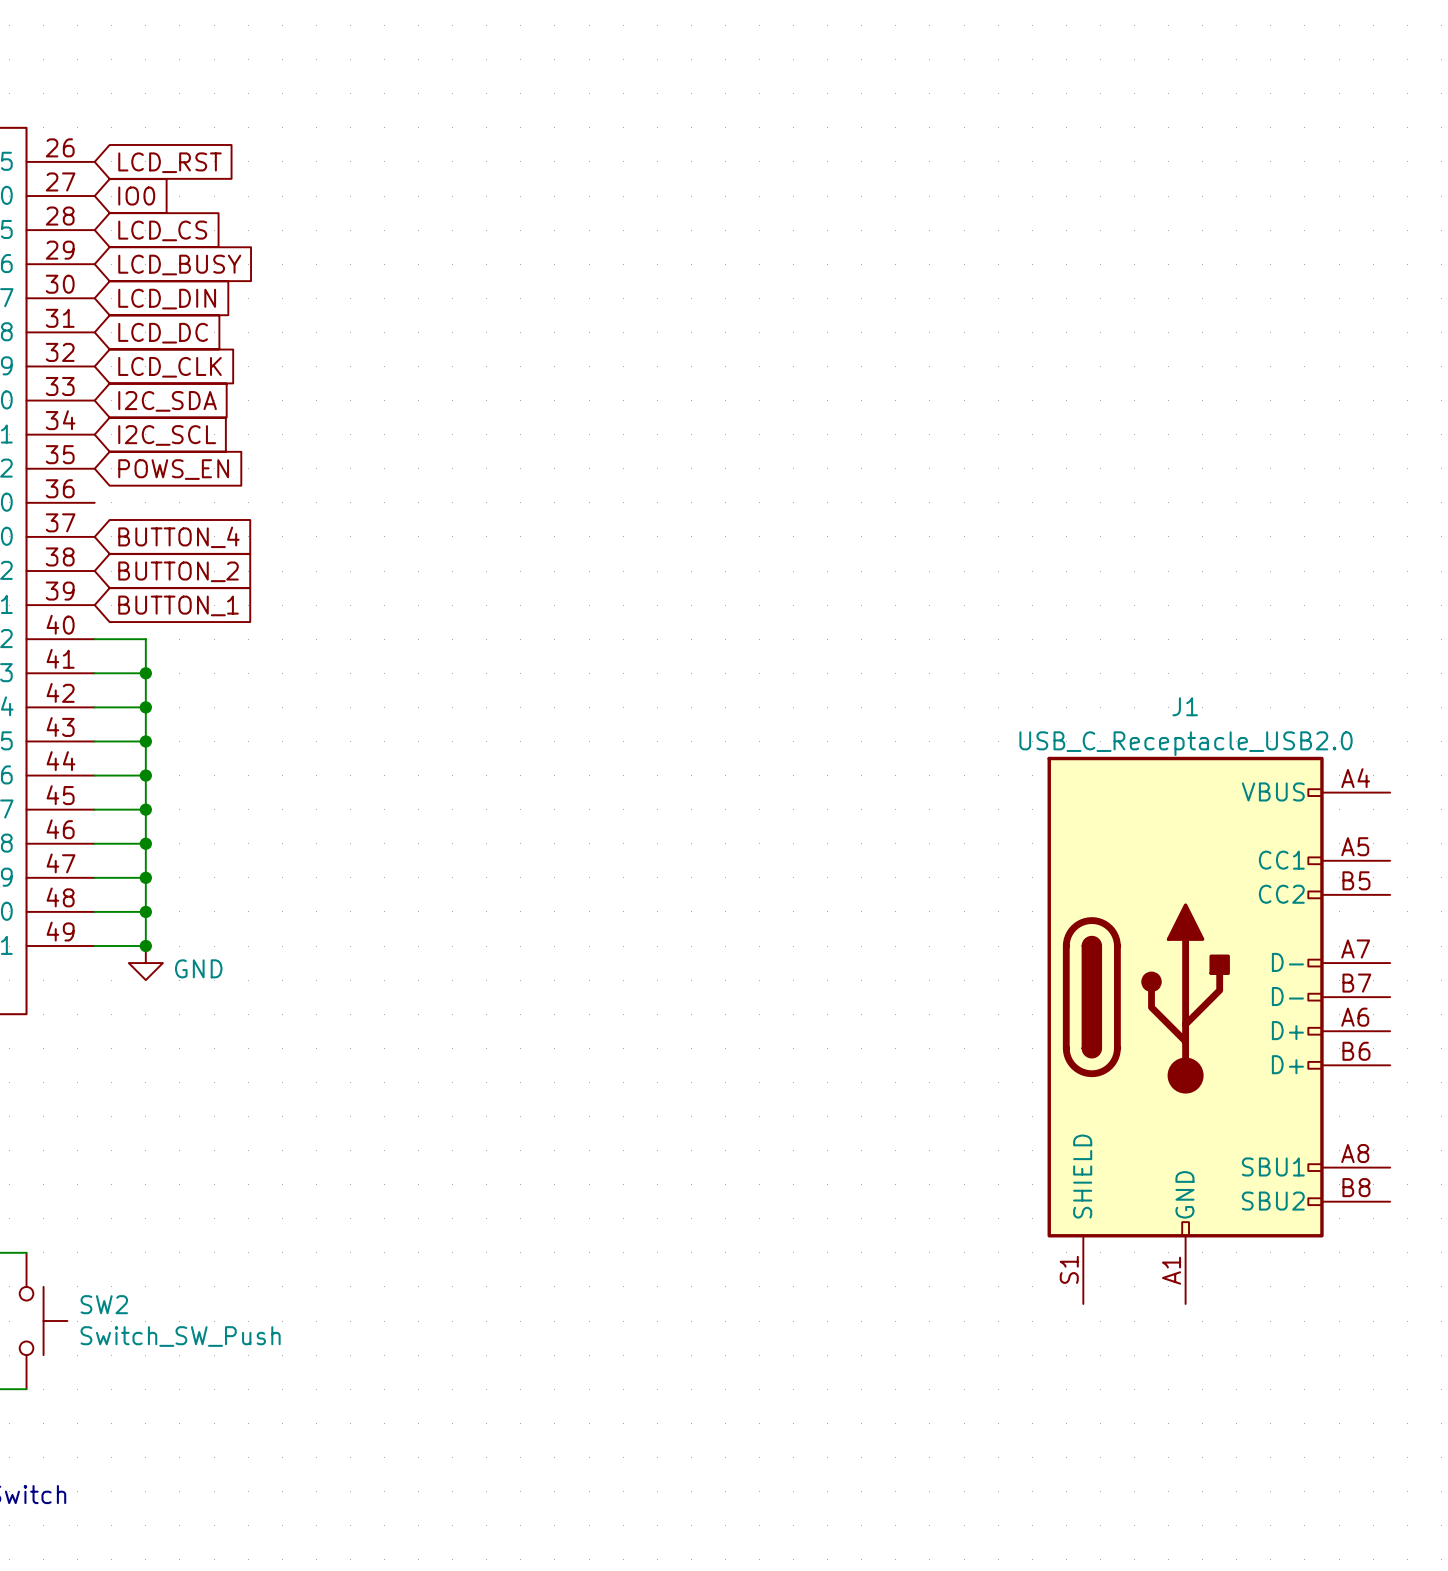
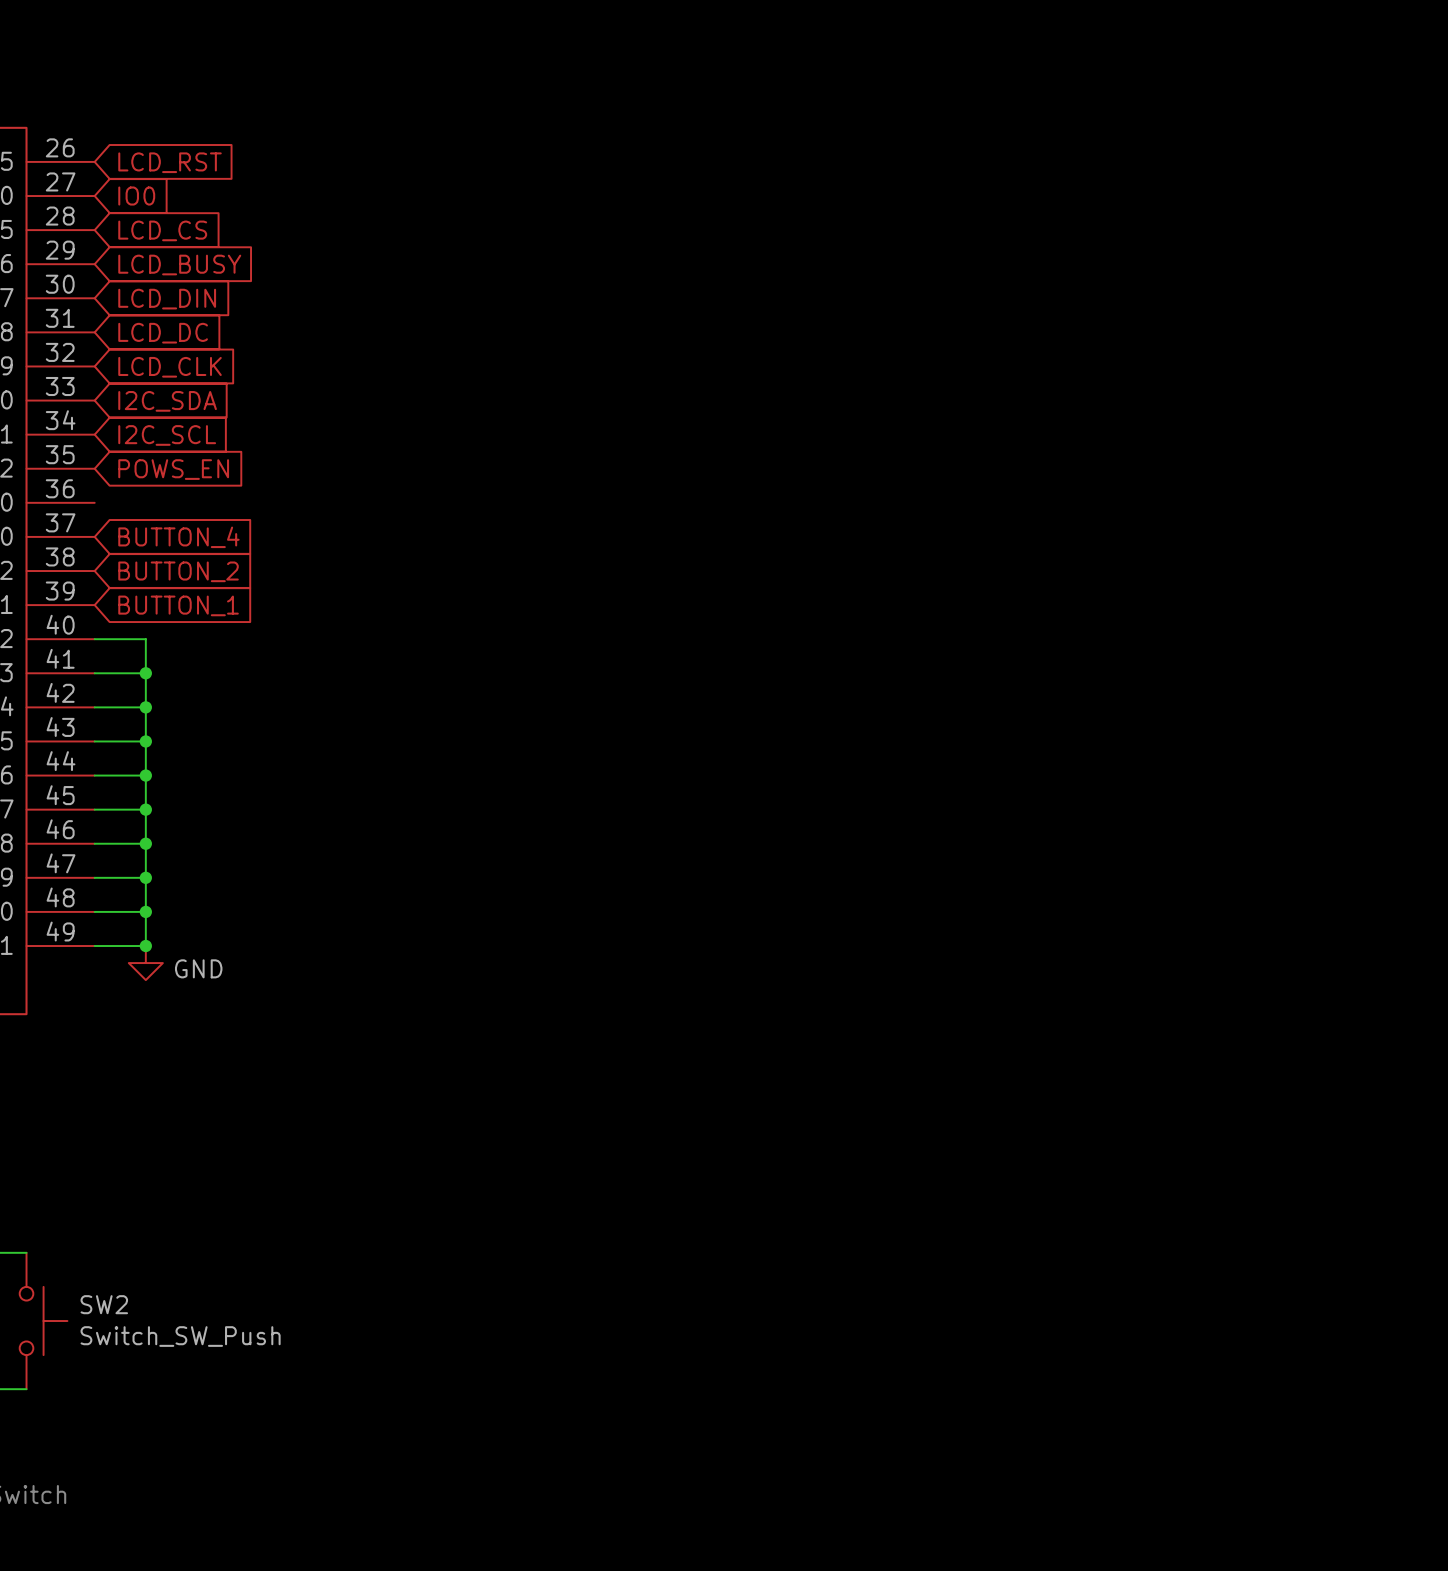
J1: USB_C_Receptacle_USB2.0 (1218, 1030) -> none

